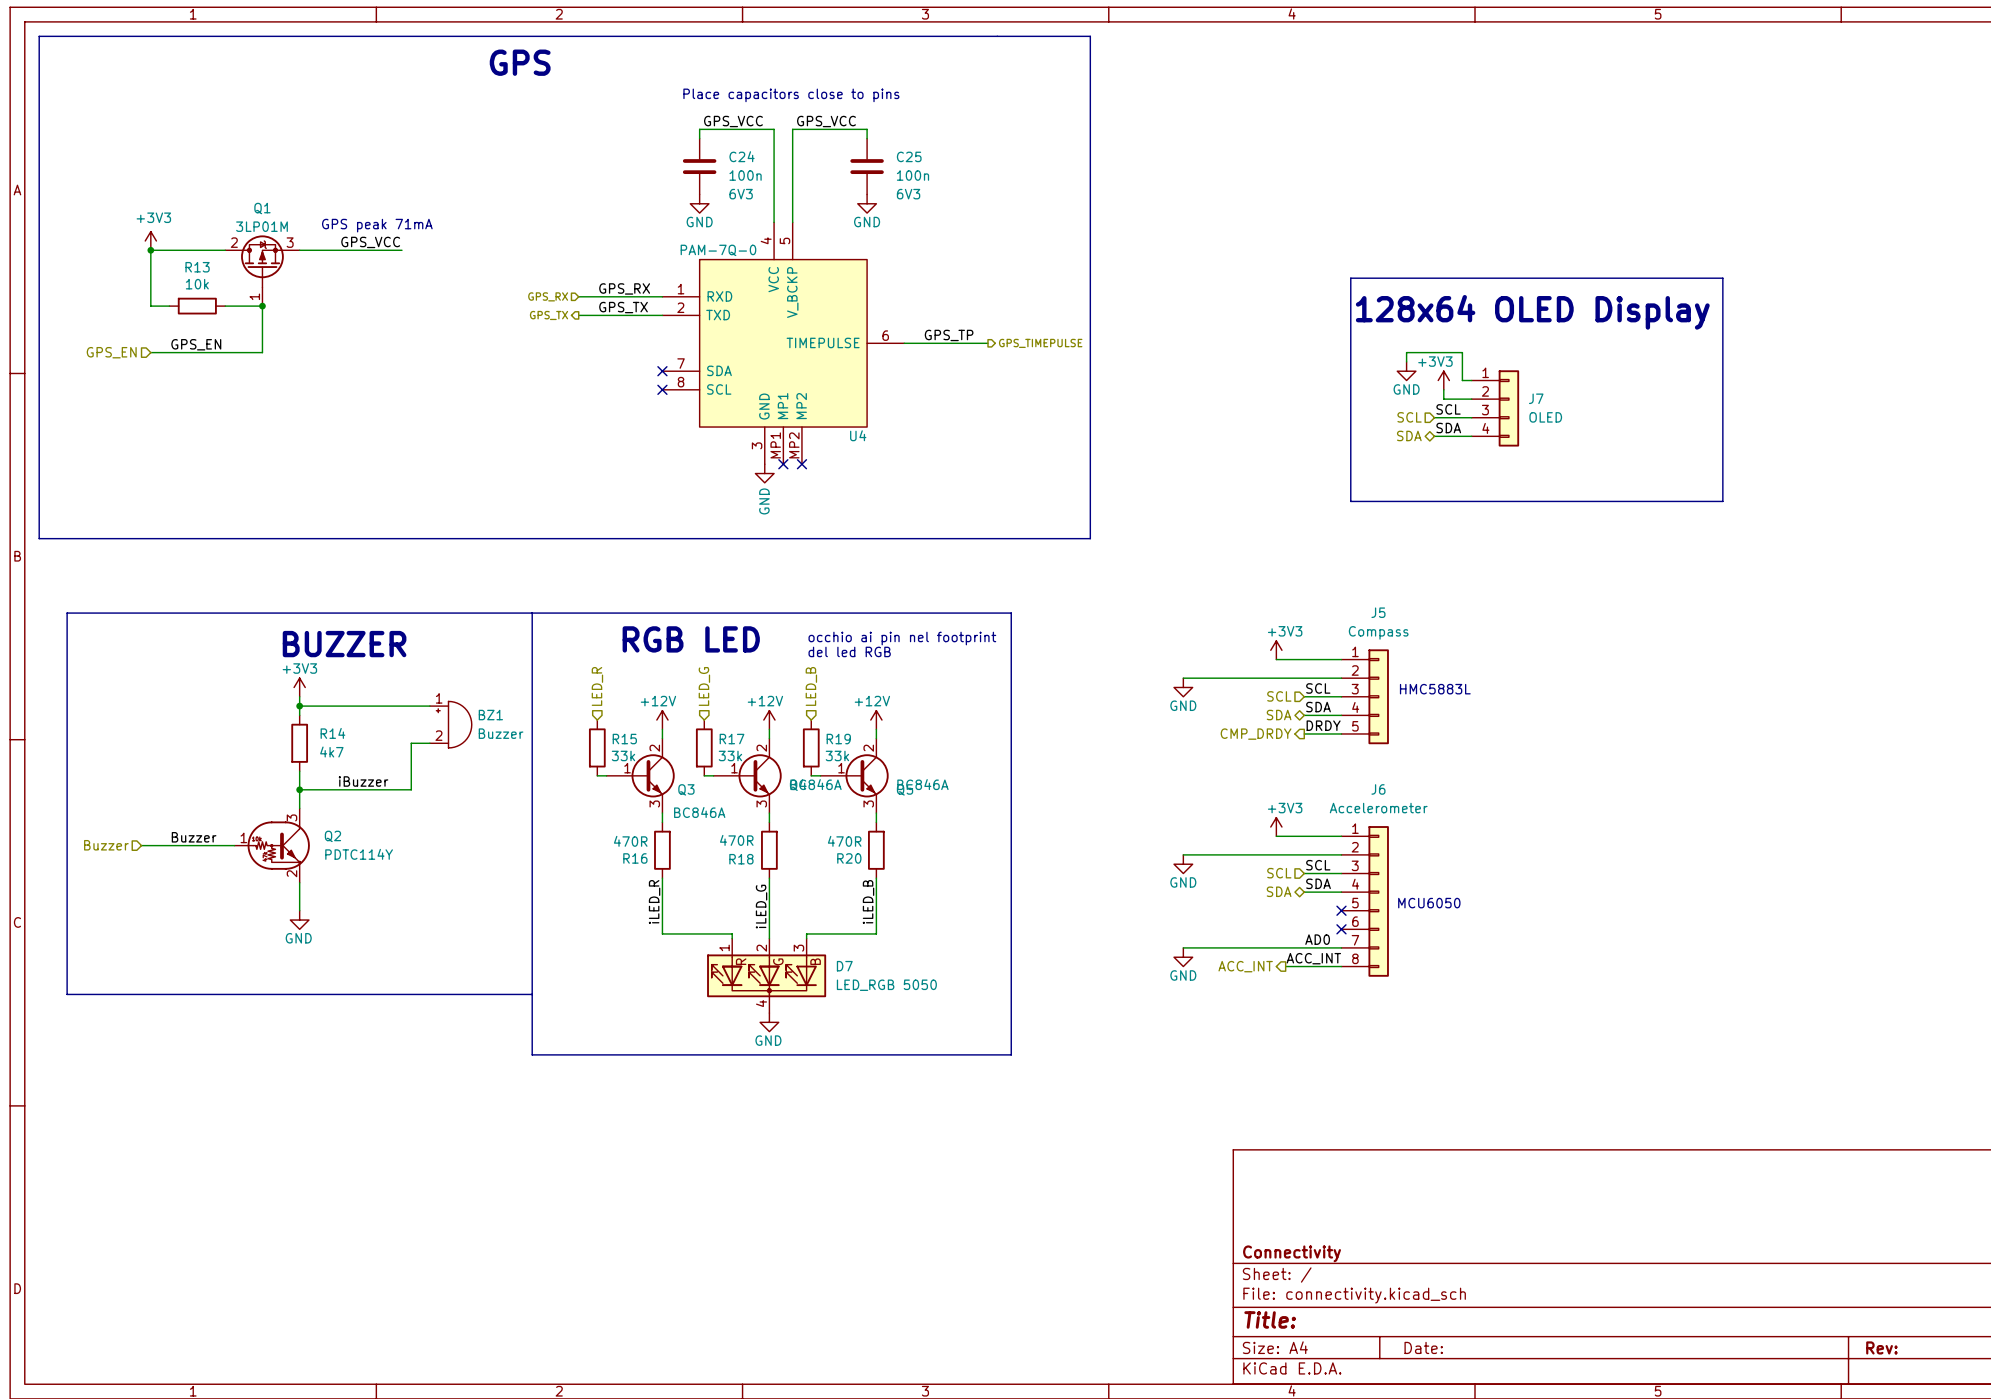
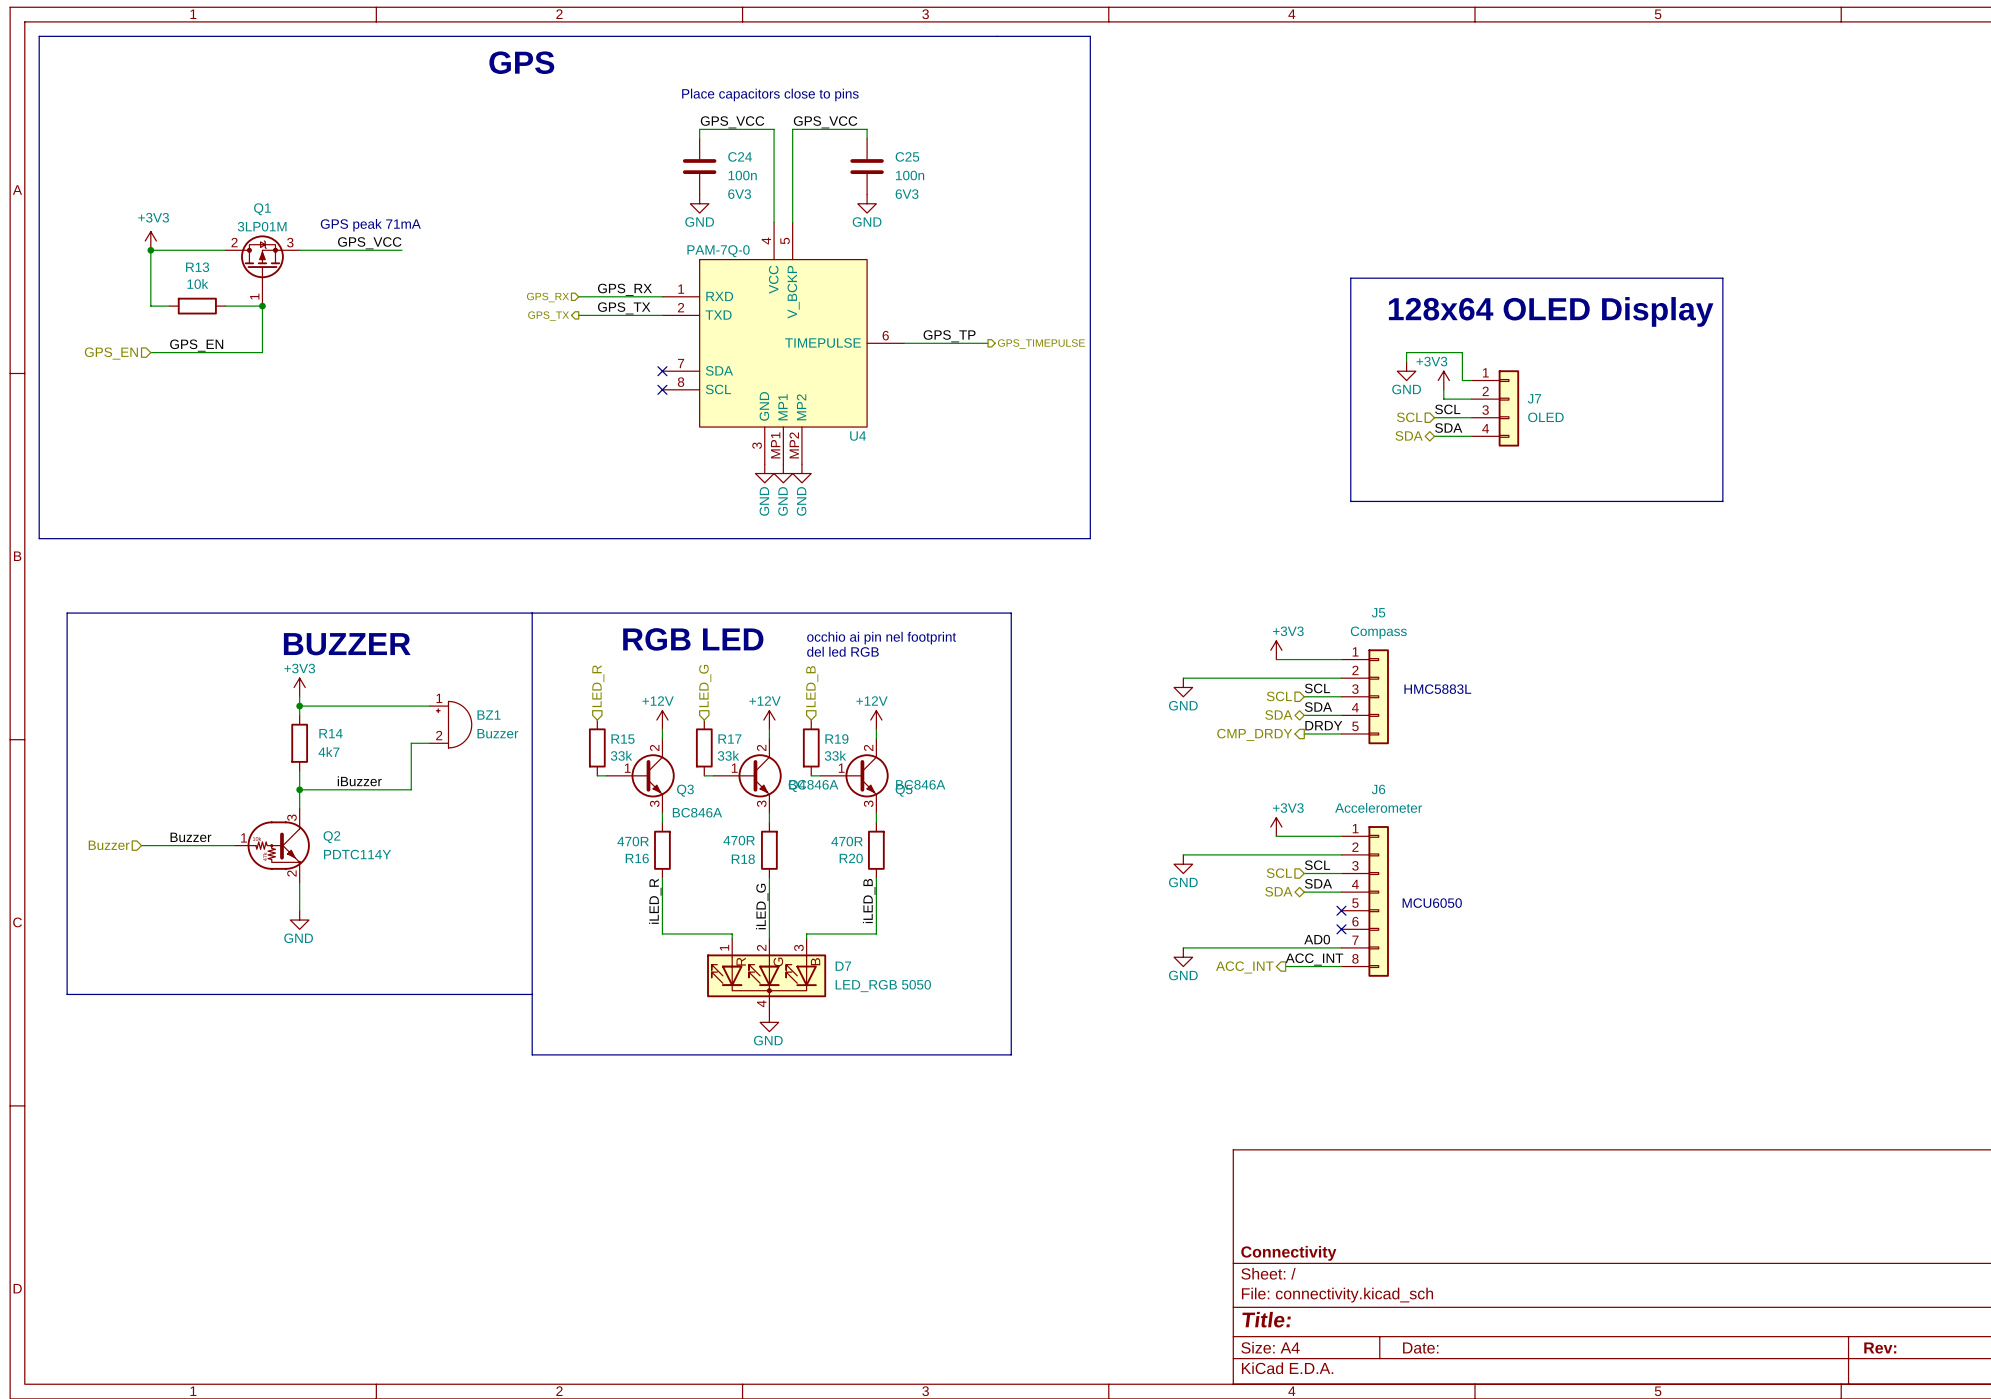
no-connect mark: (783, 464) -> none
no-connect mark: (801, 464) -> none
power symbol: none -> GND (783, 473)
power symbol: none -> GND (801, 473)

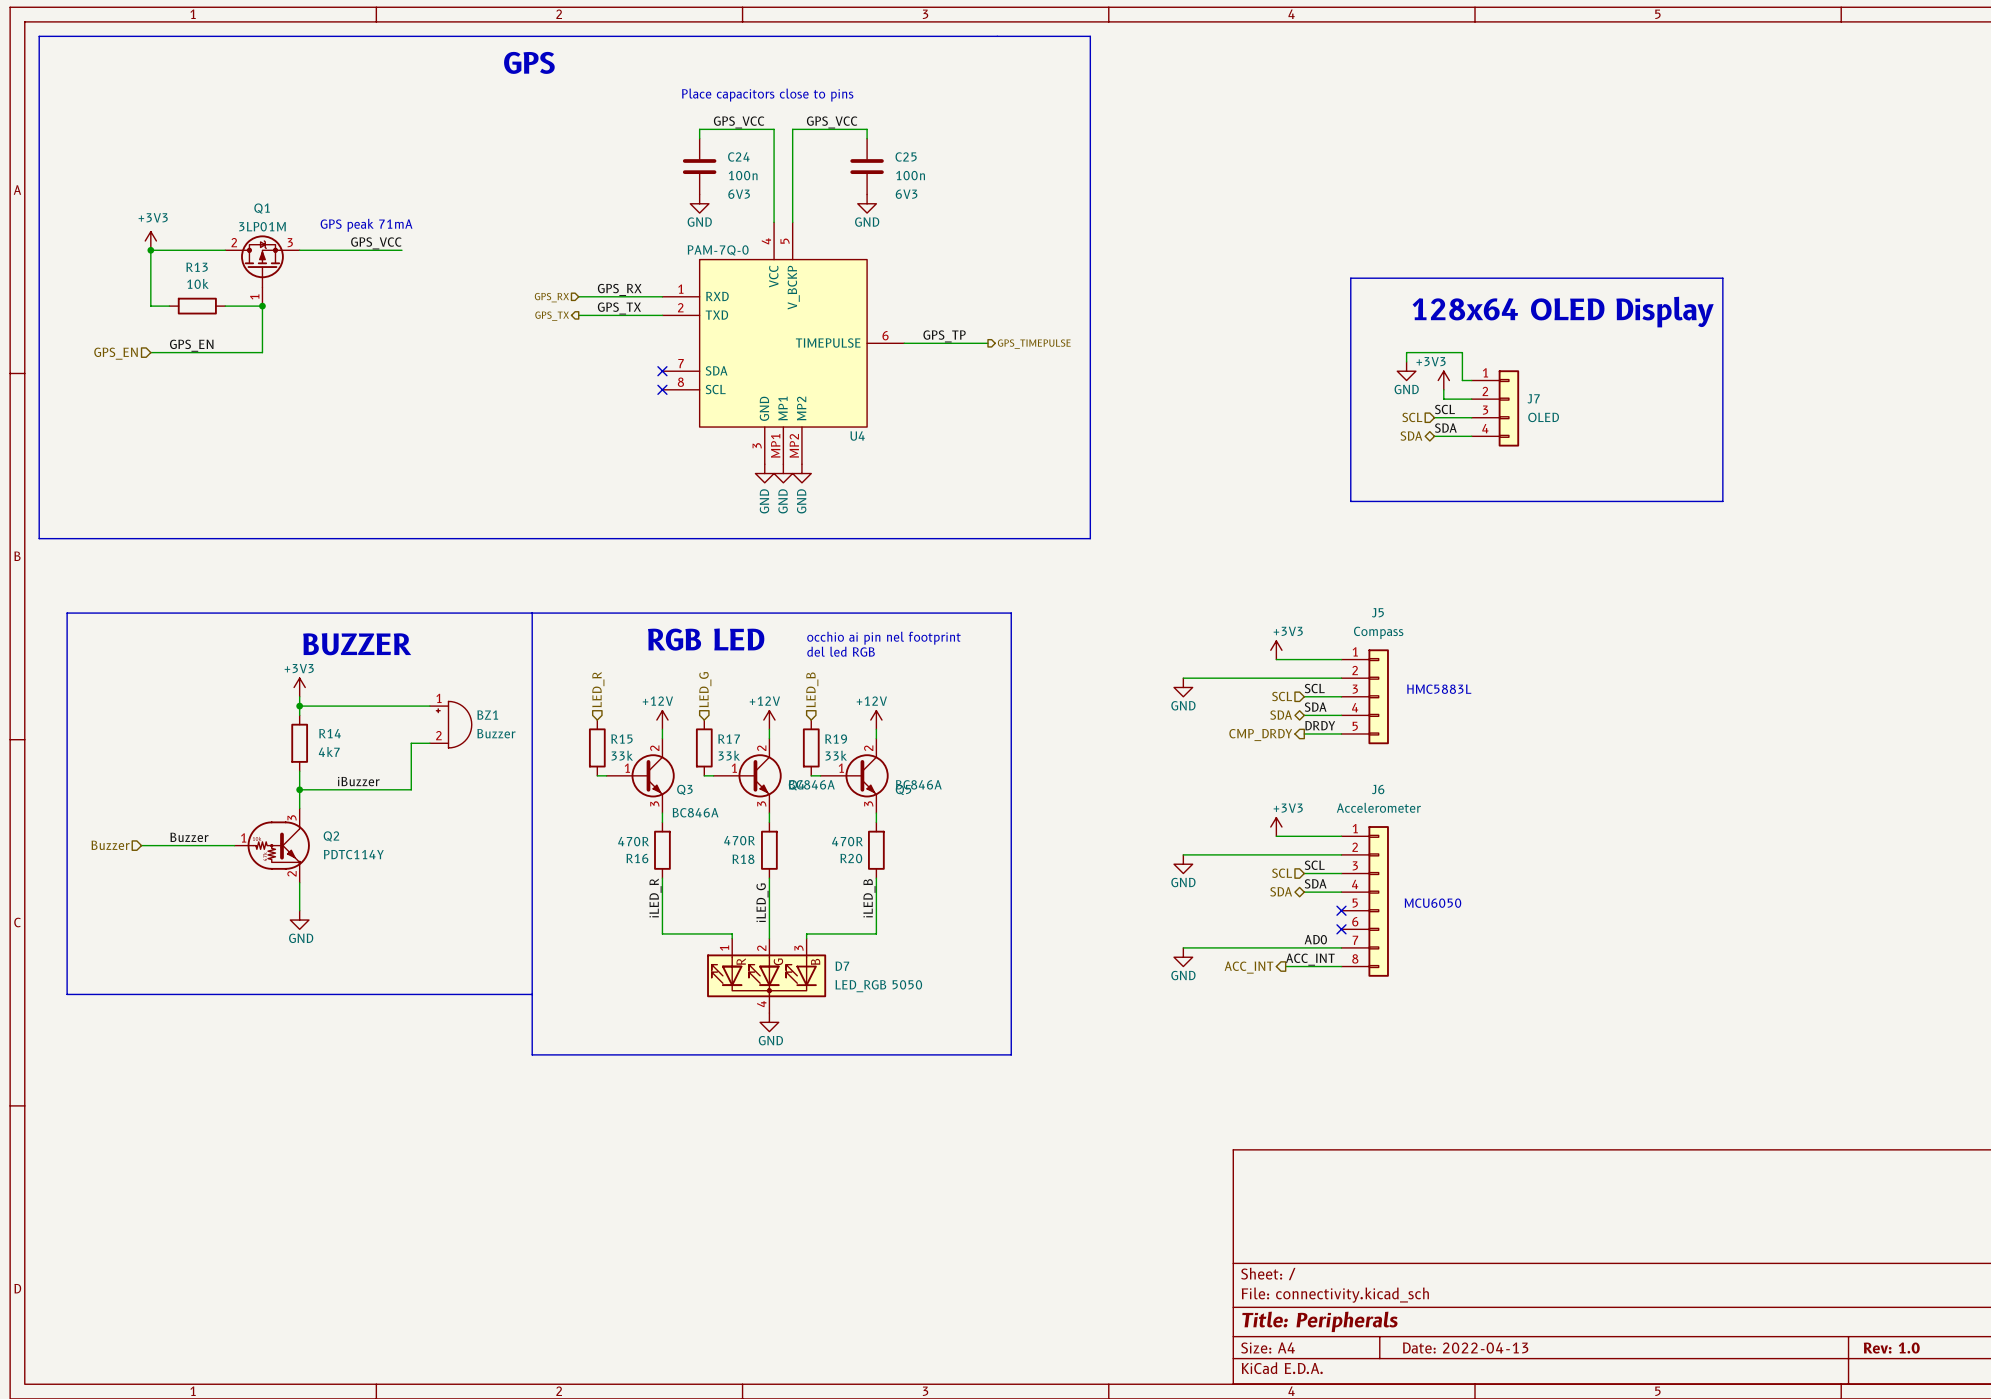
title block: Connectivity (1288, 1253) -> none
title block: Title: (1266, 1319) -> Title: Peripherals (1319, 1321)
title block: Date: (1420, 1348) -> Date: 2022-04-13 (1465, 1348)
title block: Rev: (1880, 1348) -> Rev: 1.0 (1891, 1348)

